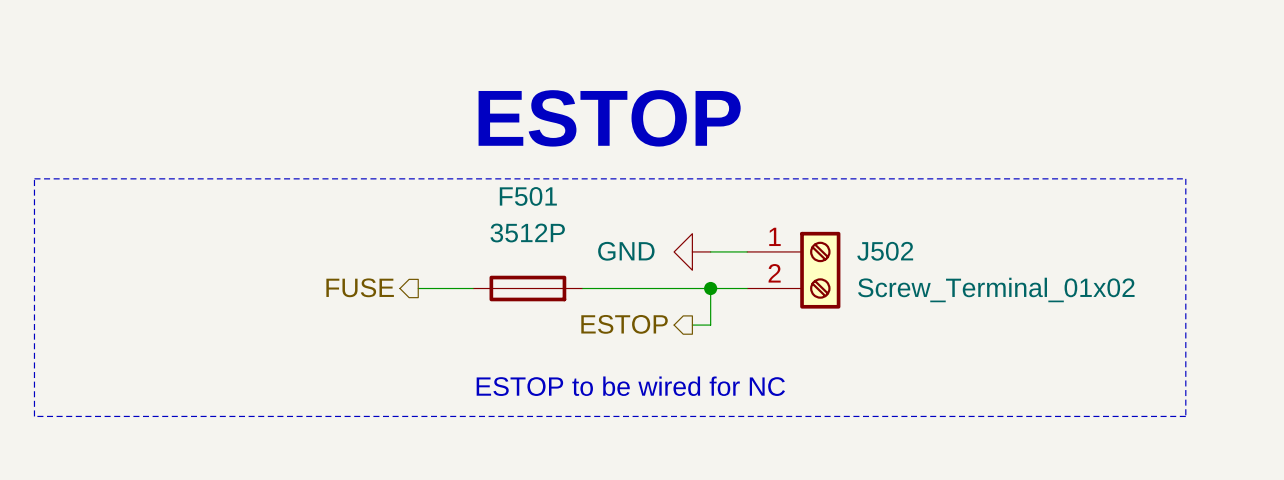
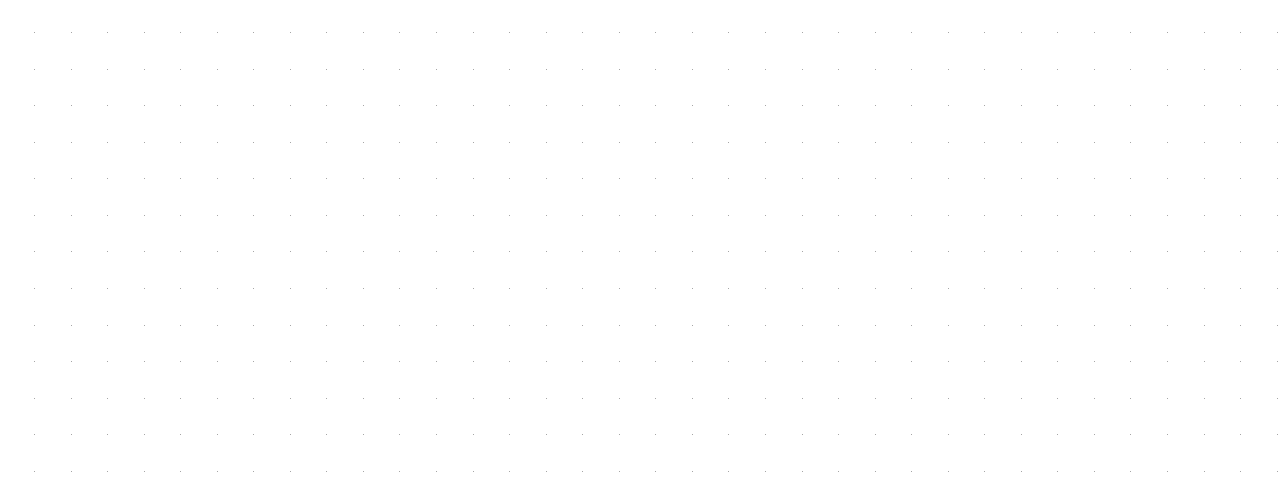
text: ESTOP (609, 118) -> none
line: (34, 178) (1185, 178) (1185, 416) (34, 416) (34, 178) -> none
power symbol: GND (692, 251) -> none
wire: (710, 251) (747, 251) -> none
J502: Screw_Terminal_01x02 (793, 270) -> none
hierarchical label: FUSE (360, 287) -> none
wire: (418, 288) (473, 288) -> none
F501: 3512P (527, 288) -> none
wire: (582, 288) (747, 288) -> none
wire: (710, 288) (710, 325) (692, 325) -> none
junction: (710, 288) -> none
hierarchical label: ESTOP (624, 324) -> none
text: ESTOP to be wired for NC (630, 386) -> none

